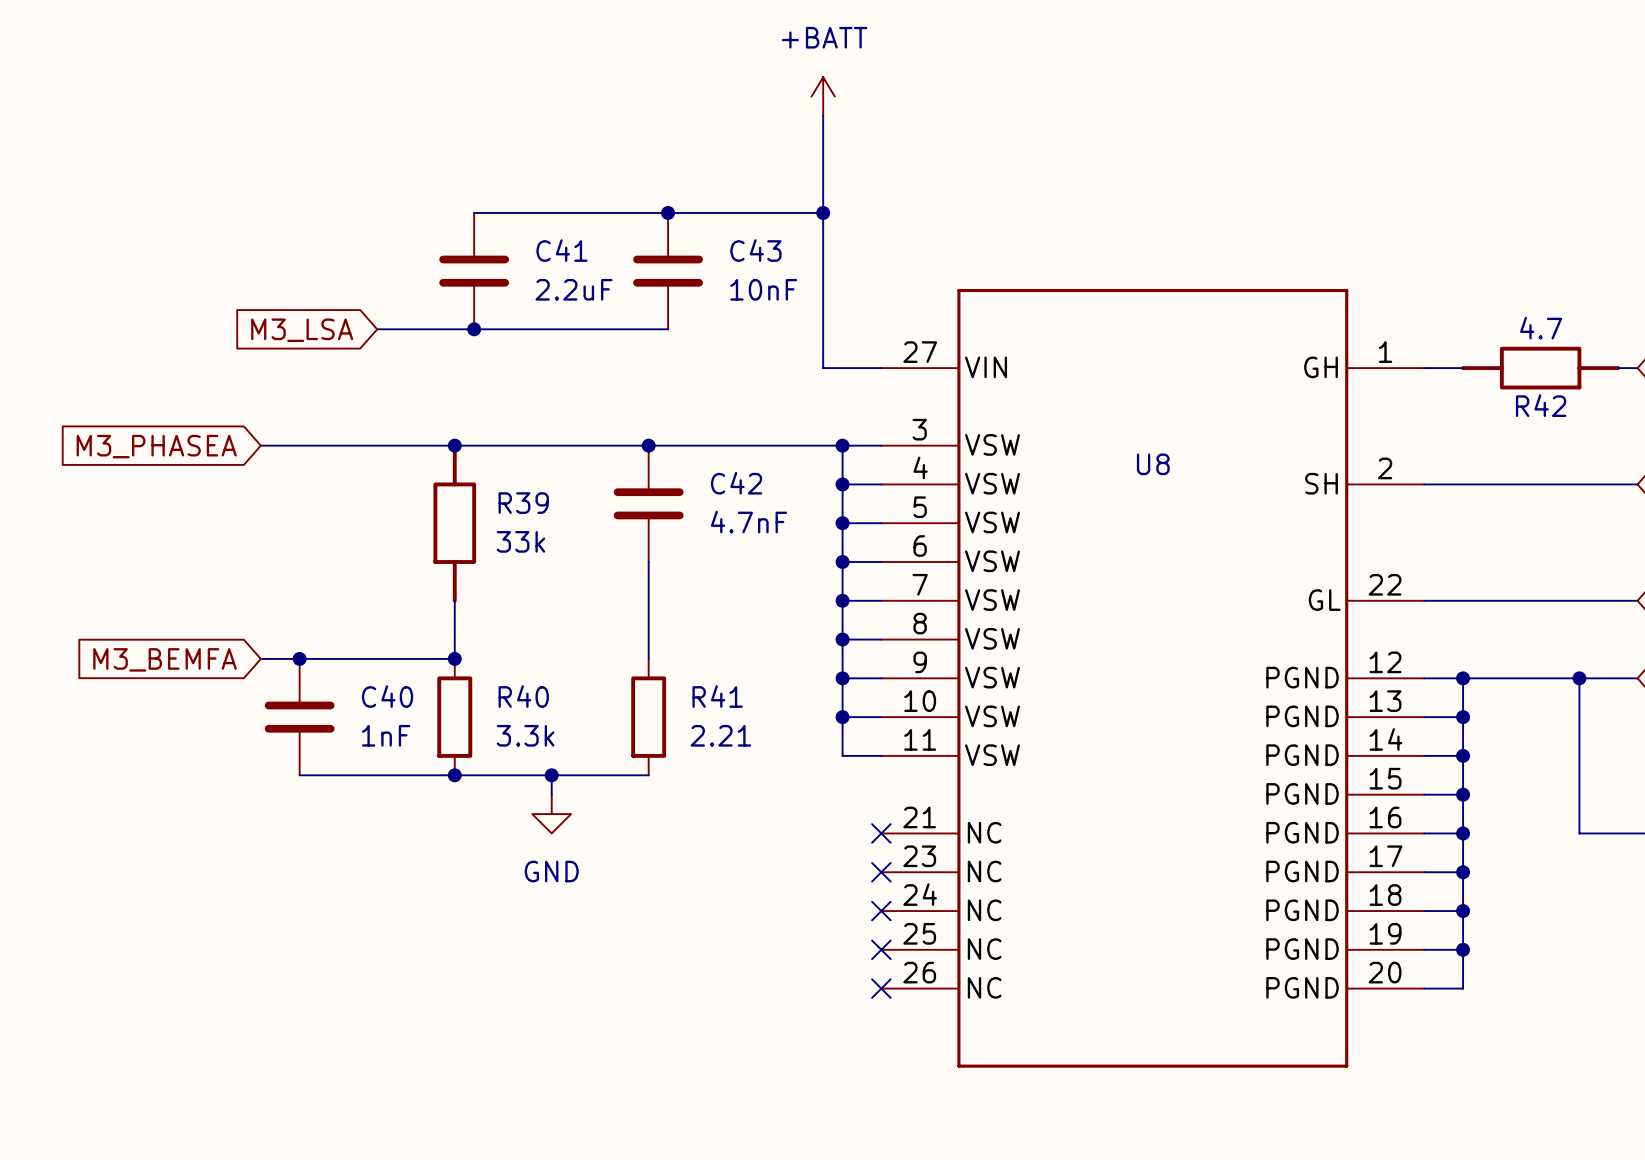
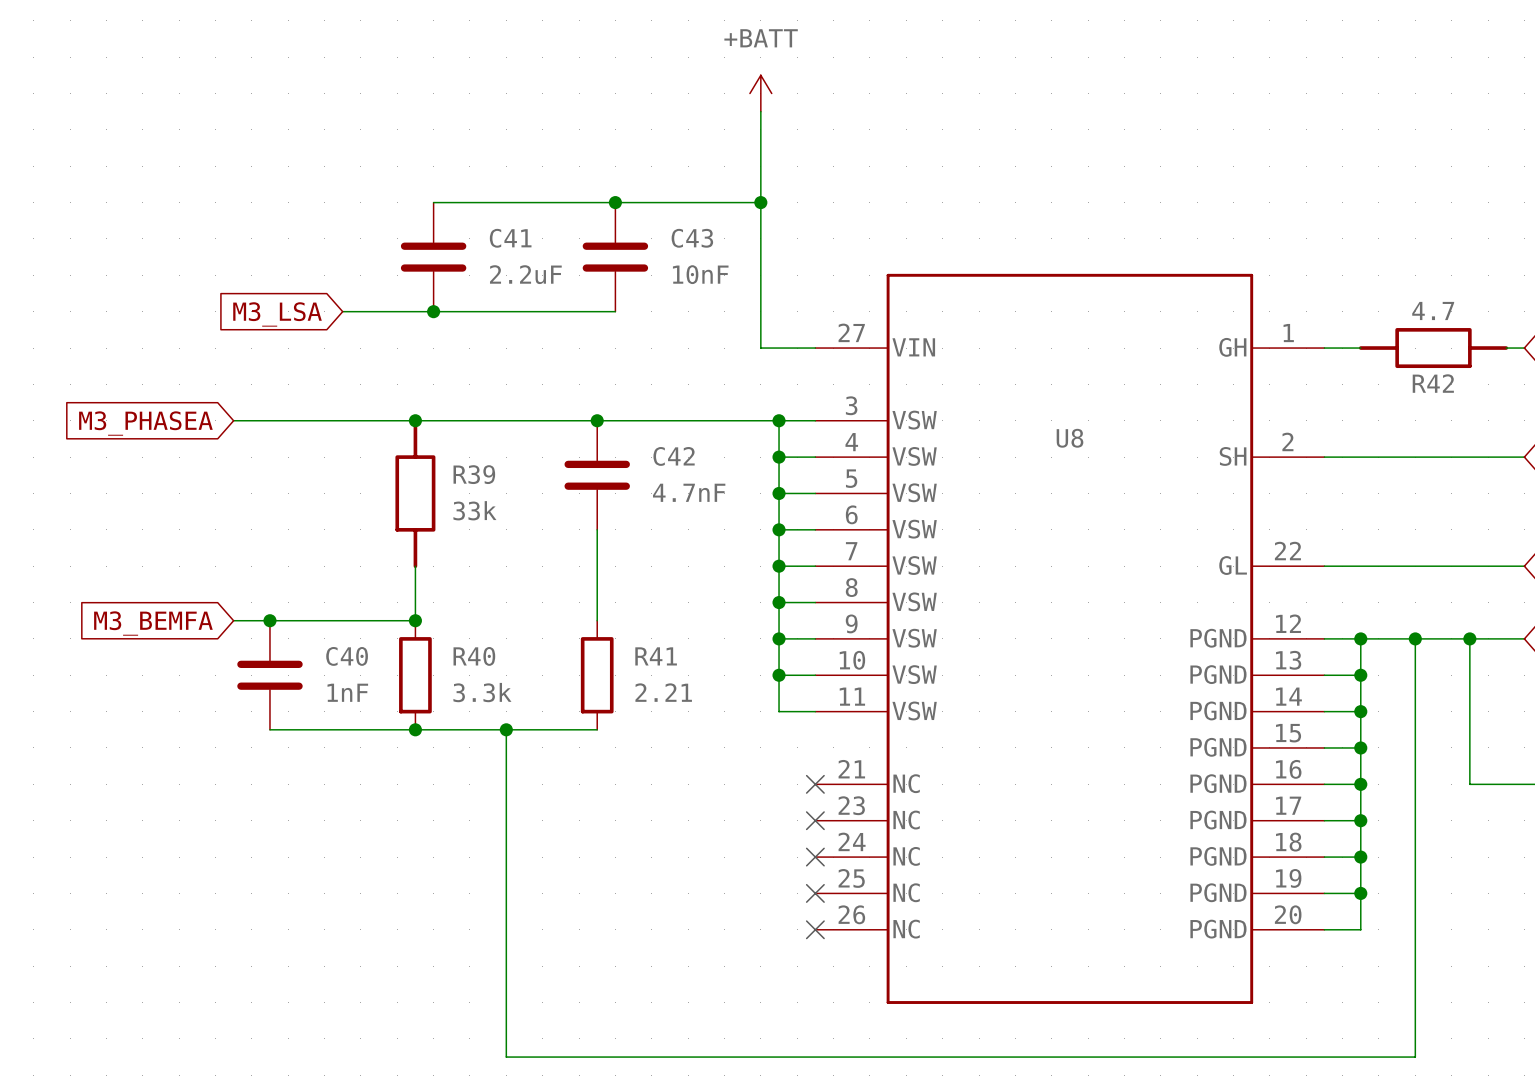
wire: none -> (1415, 638) (1415, 1057) (506, 1057) (506, 747)
junction: none -> (1415, 638)
power symbol: GND (551, 814) -> none

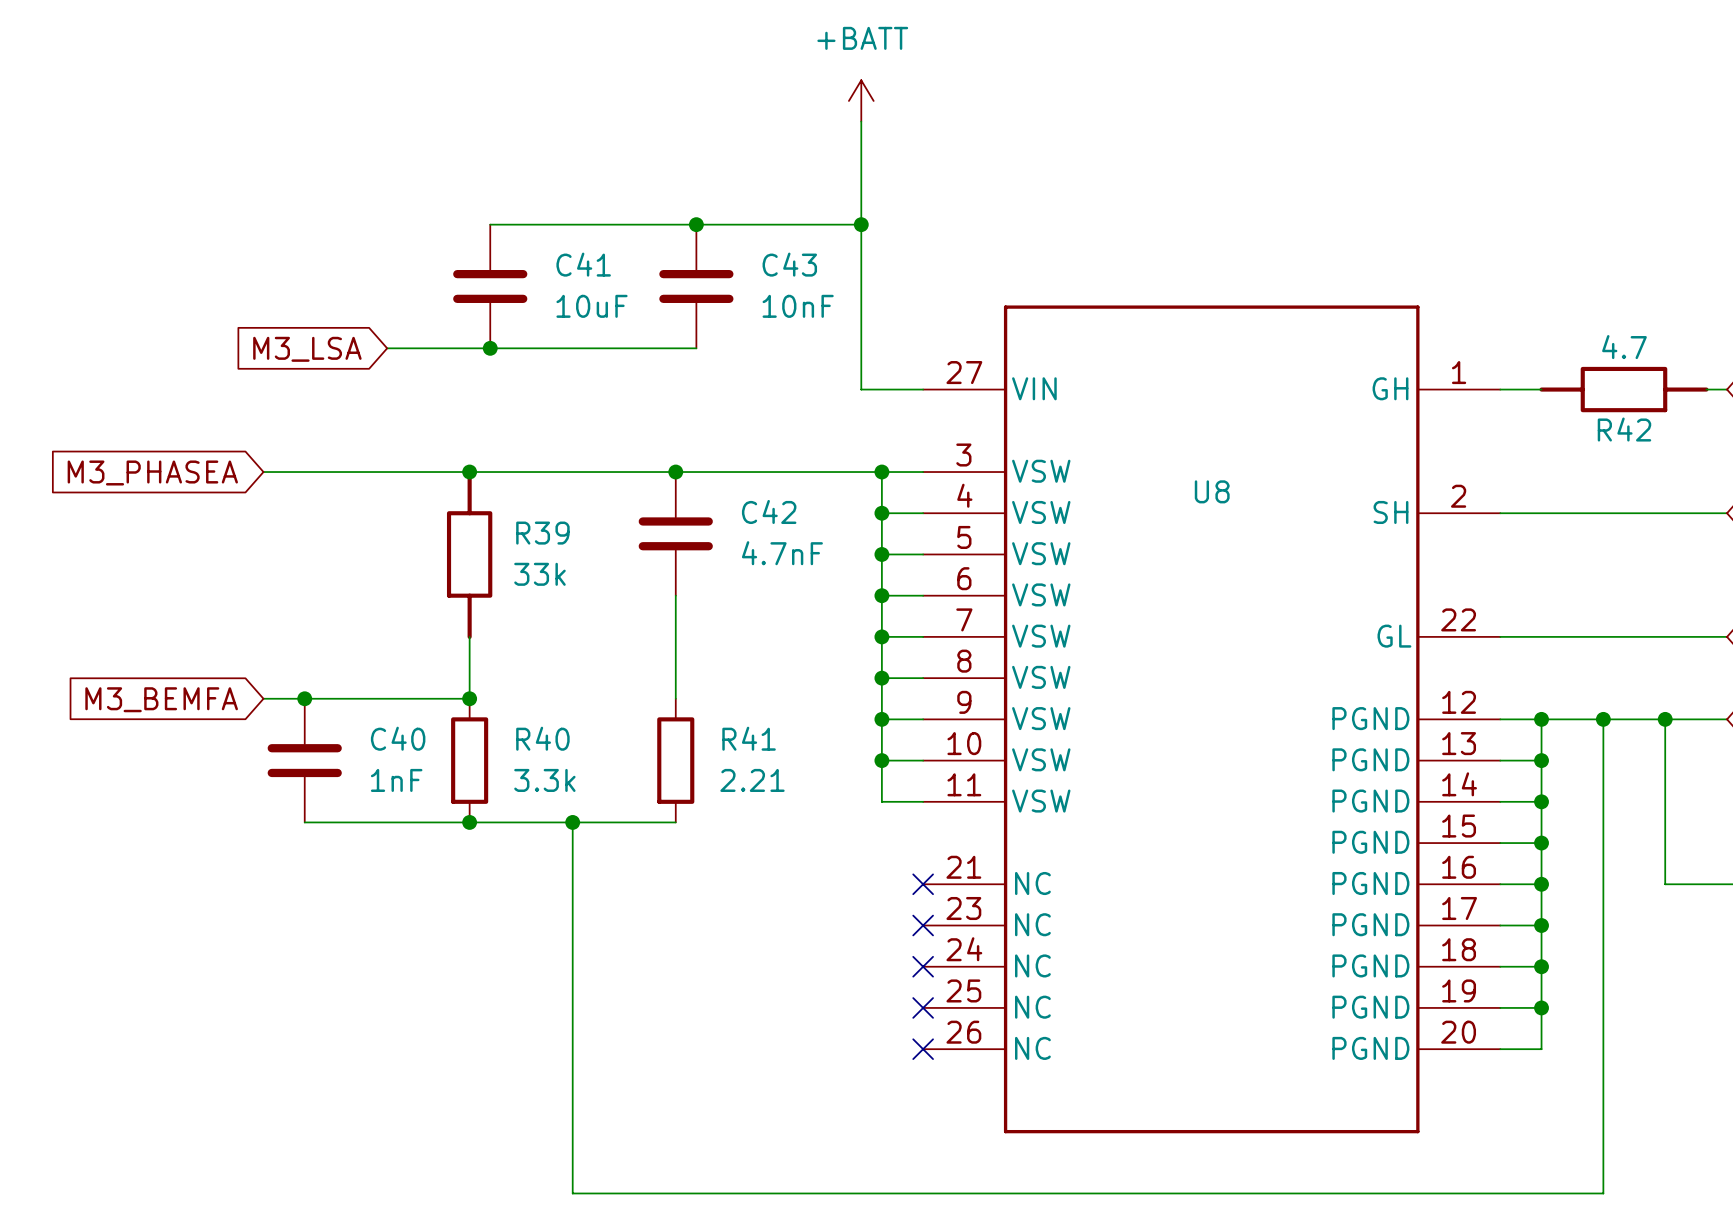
C41 value: 2.2uF (525, 274) -> 10uF (592, 306)

